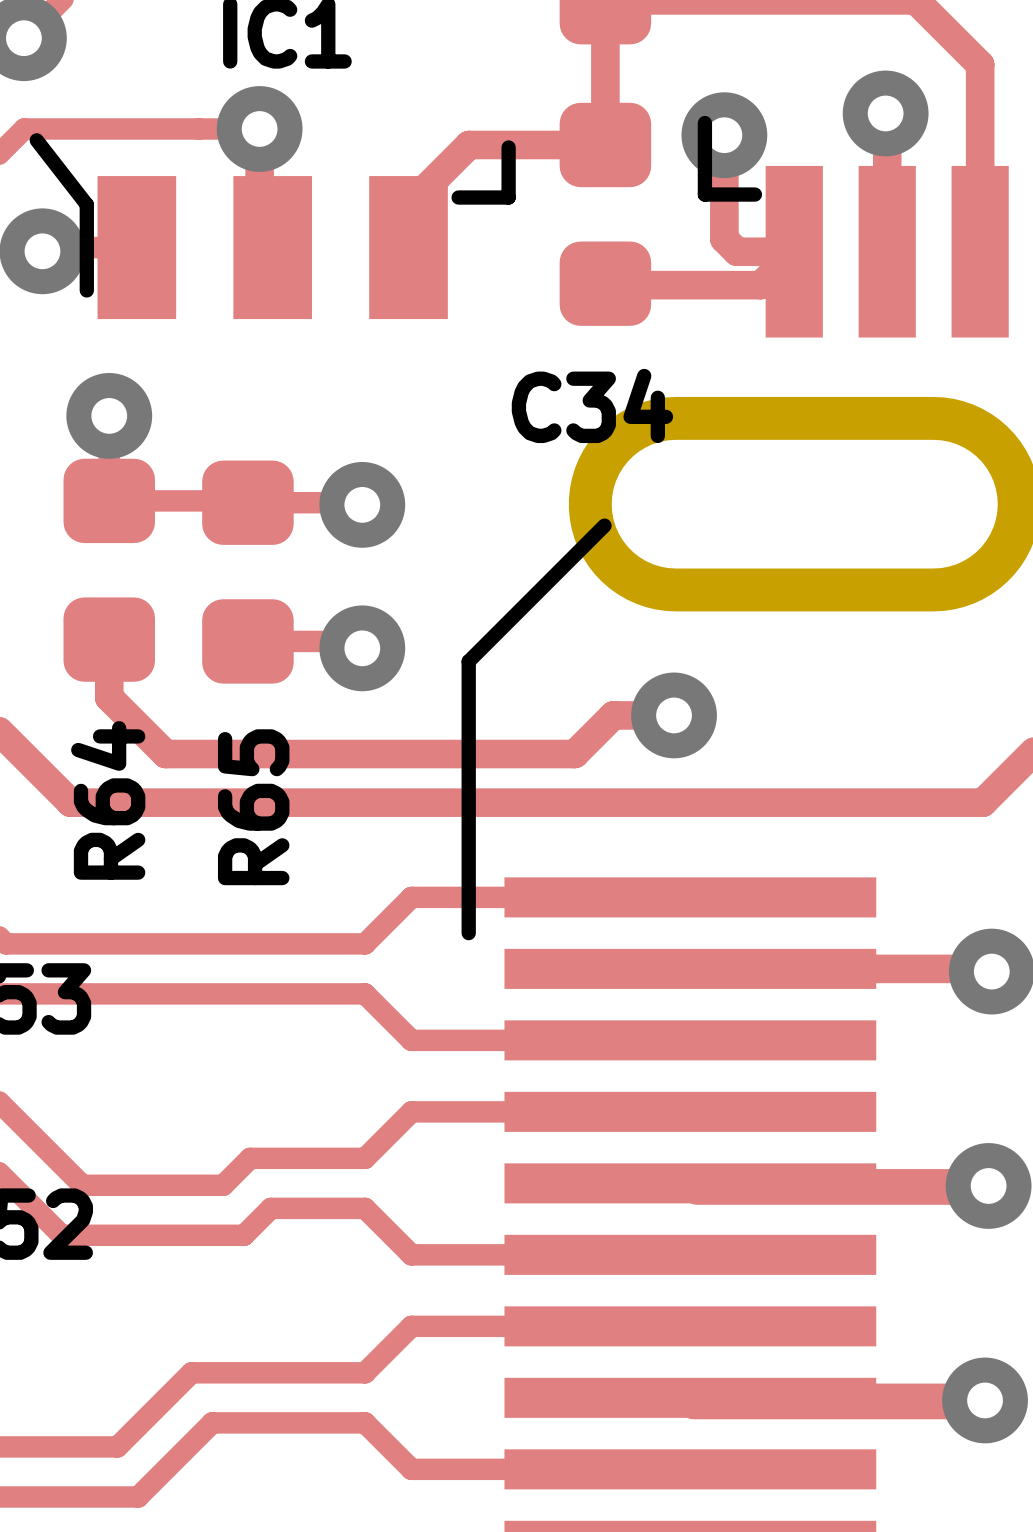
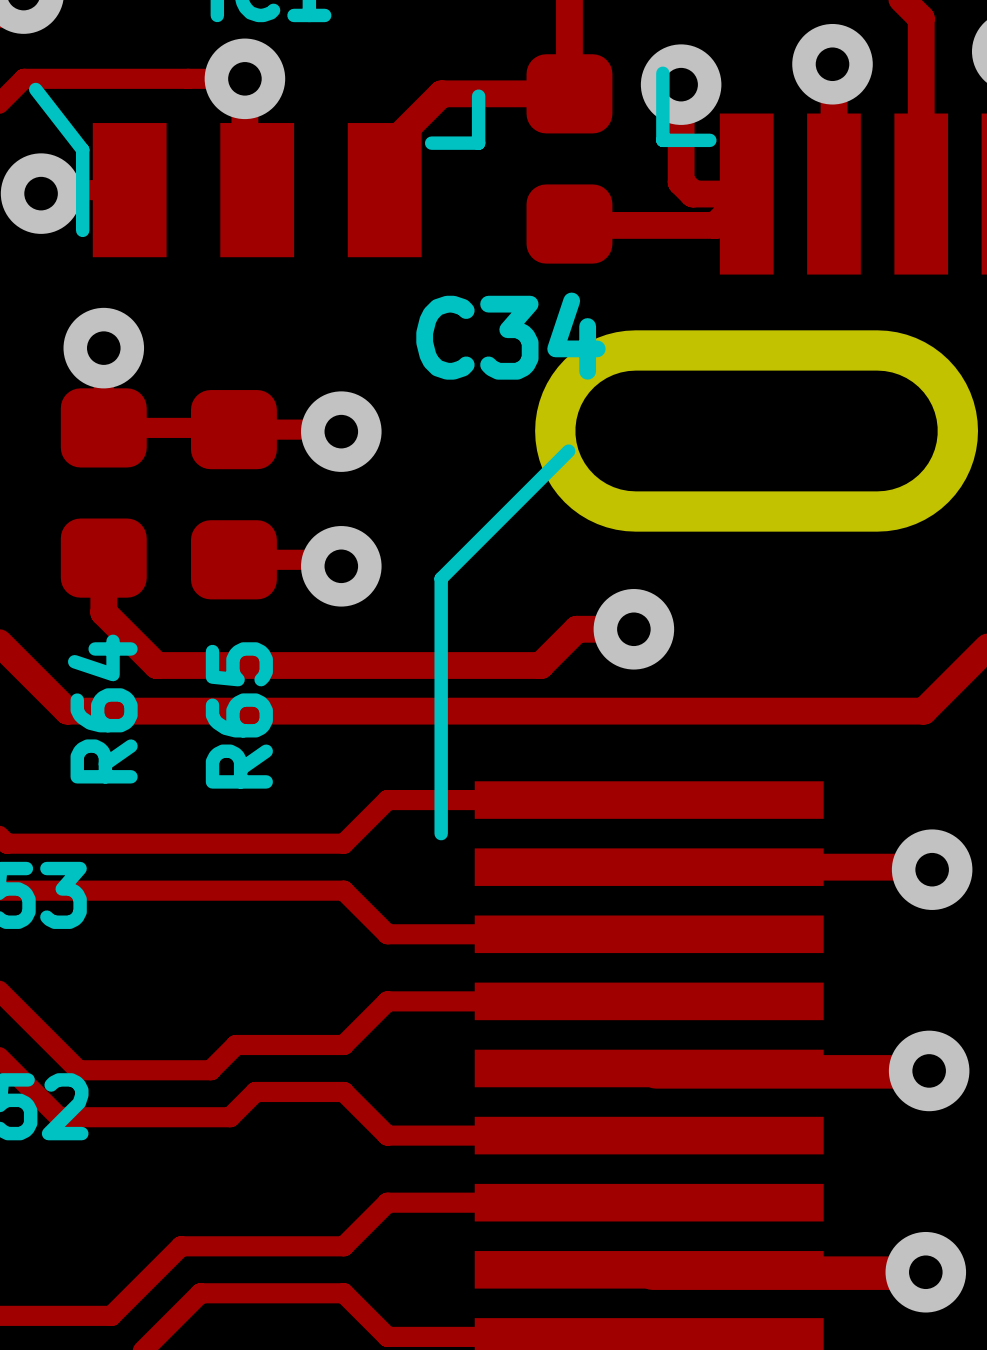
C34 name position: C34 (592, 405) -> C34 (510, 336)

